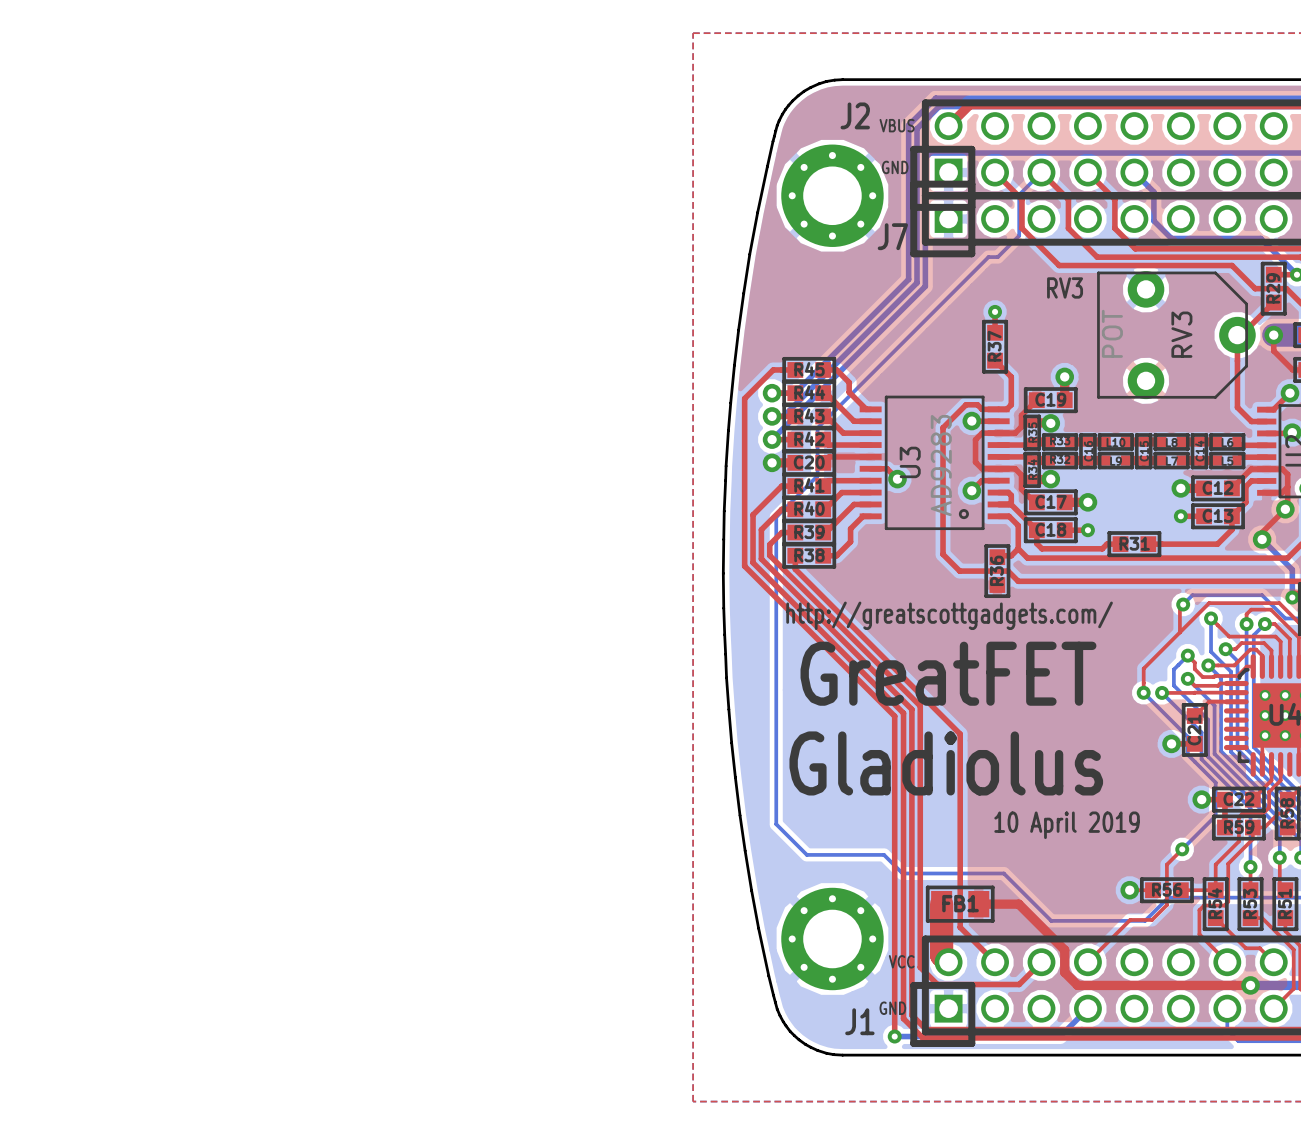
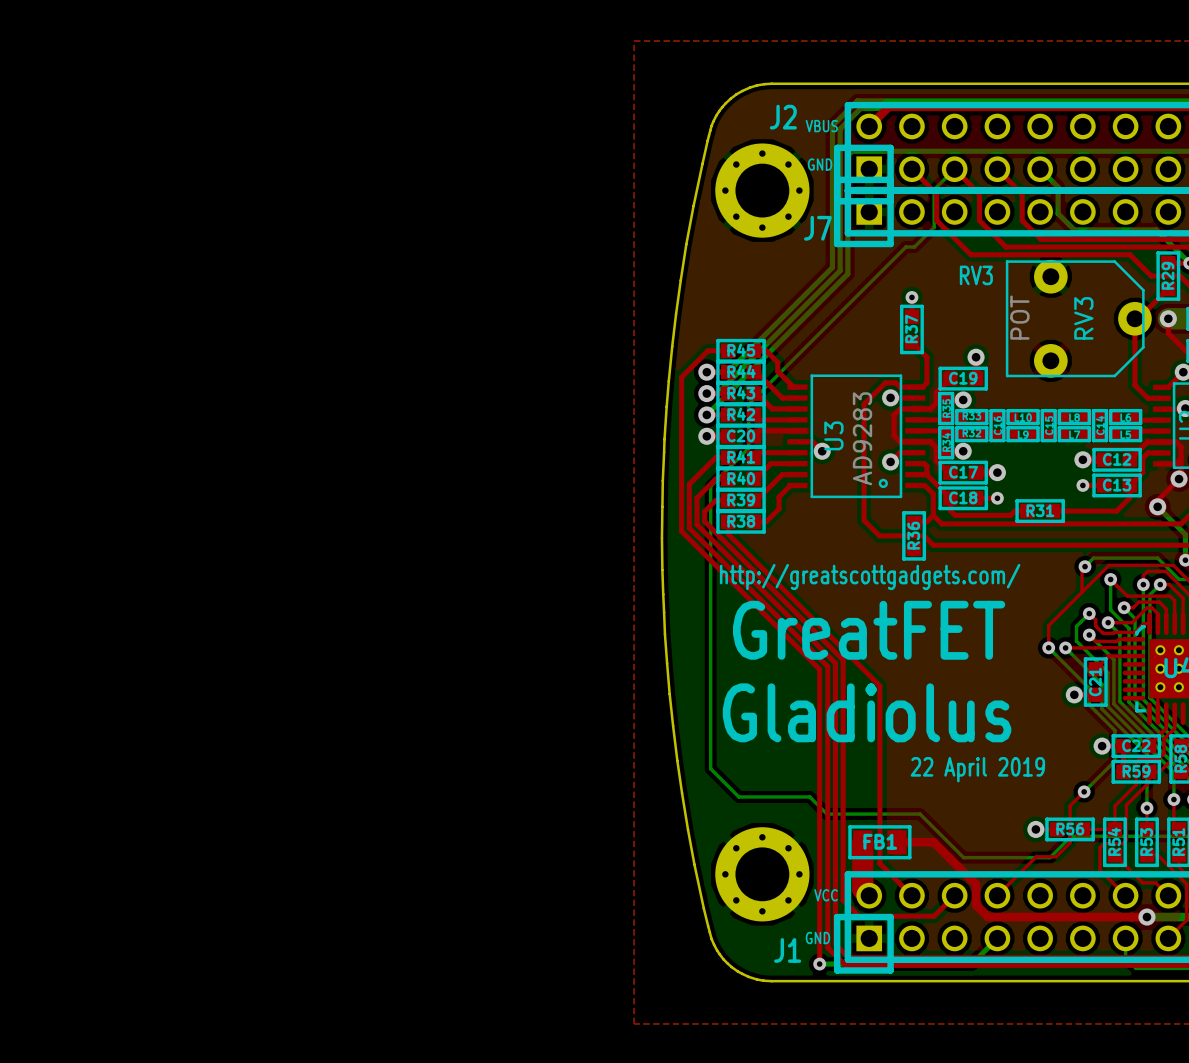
text: 10 April 2019 (1067, 825) -> 22 April 2019 (977, 769)

